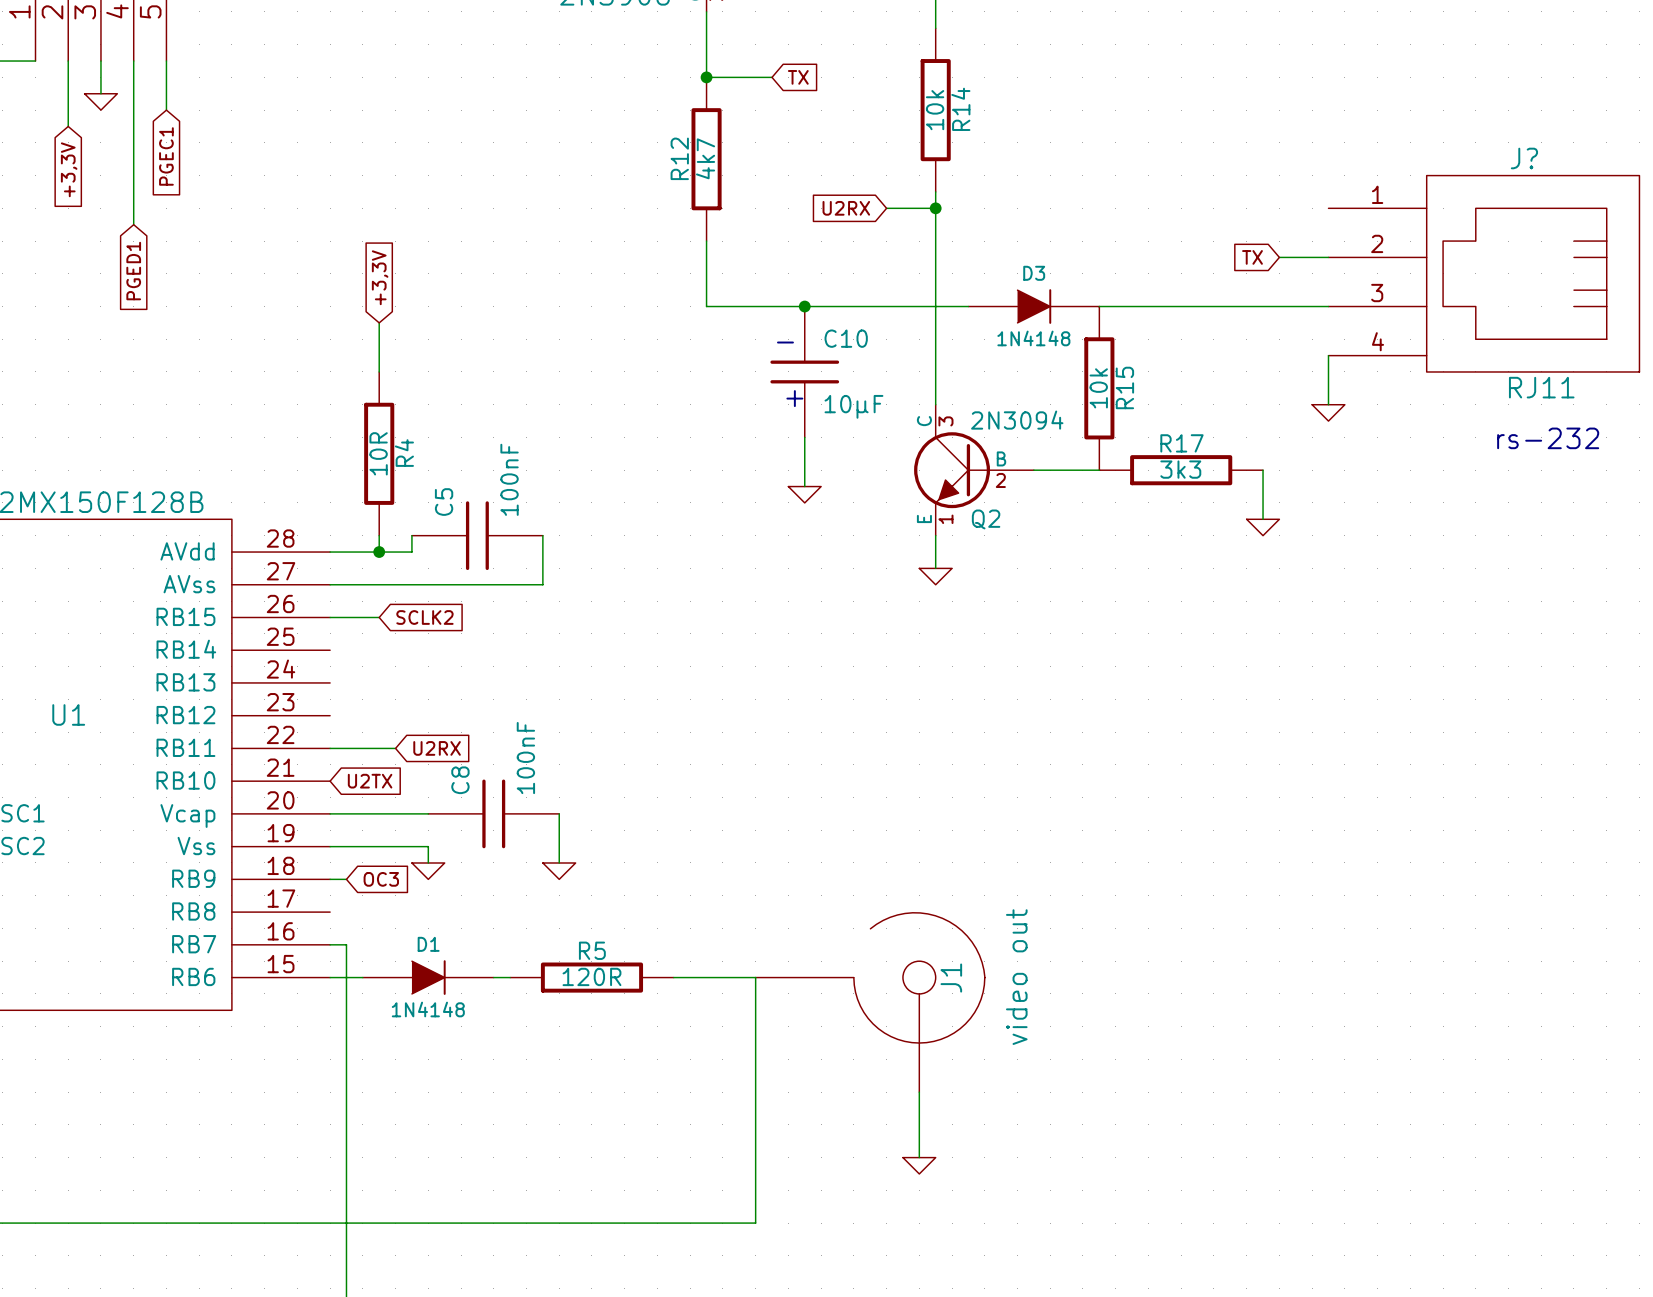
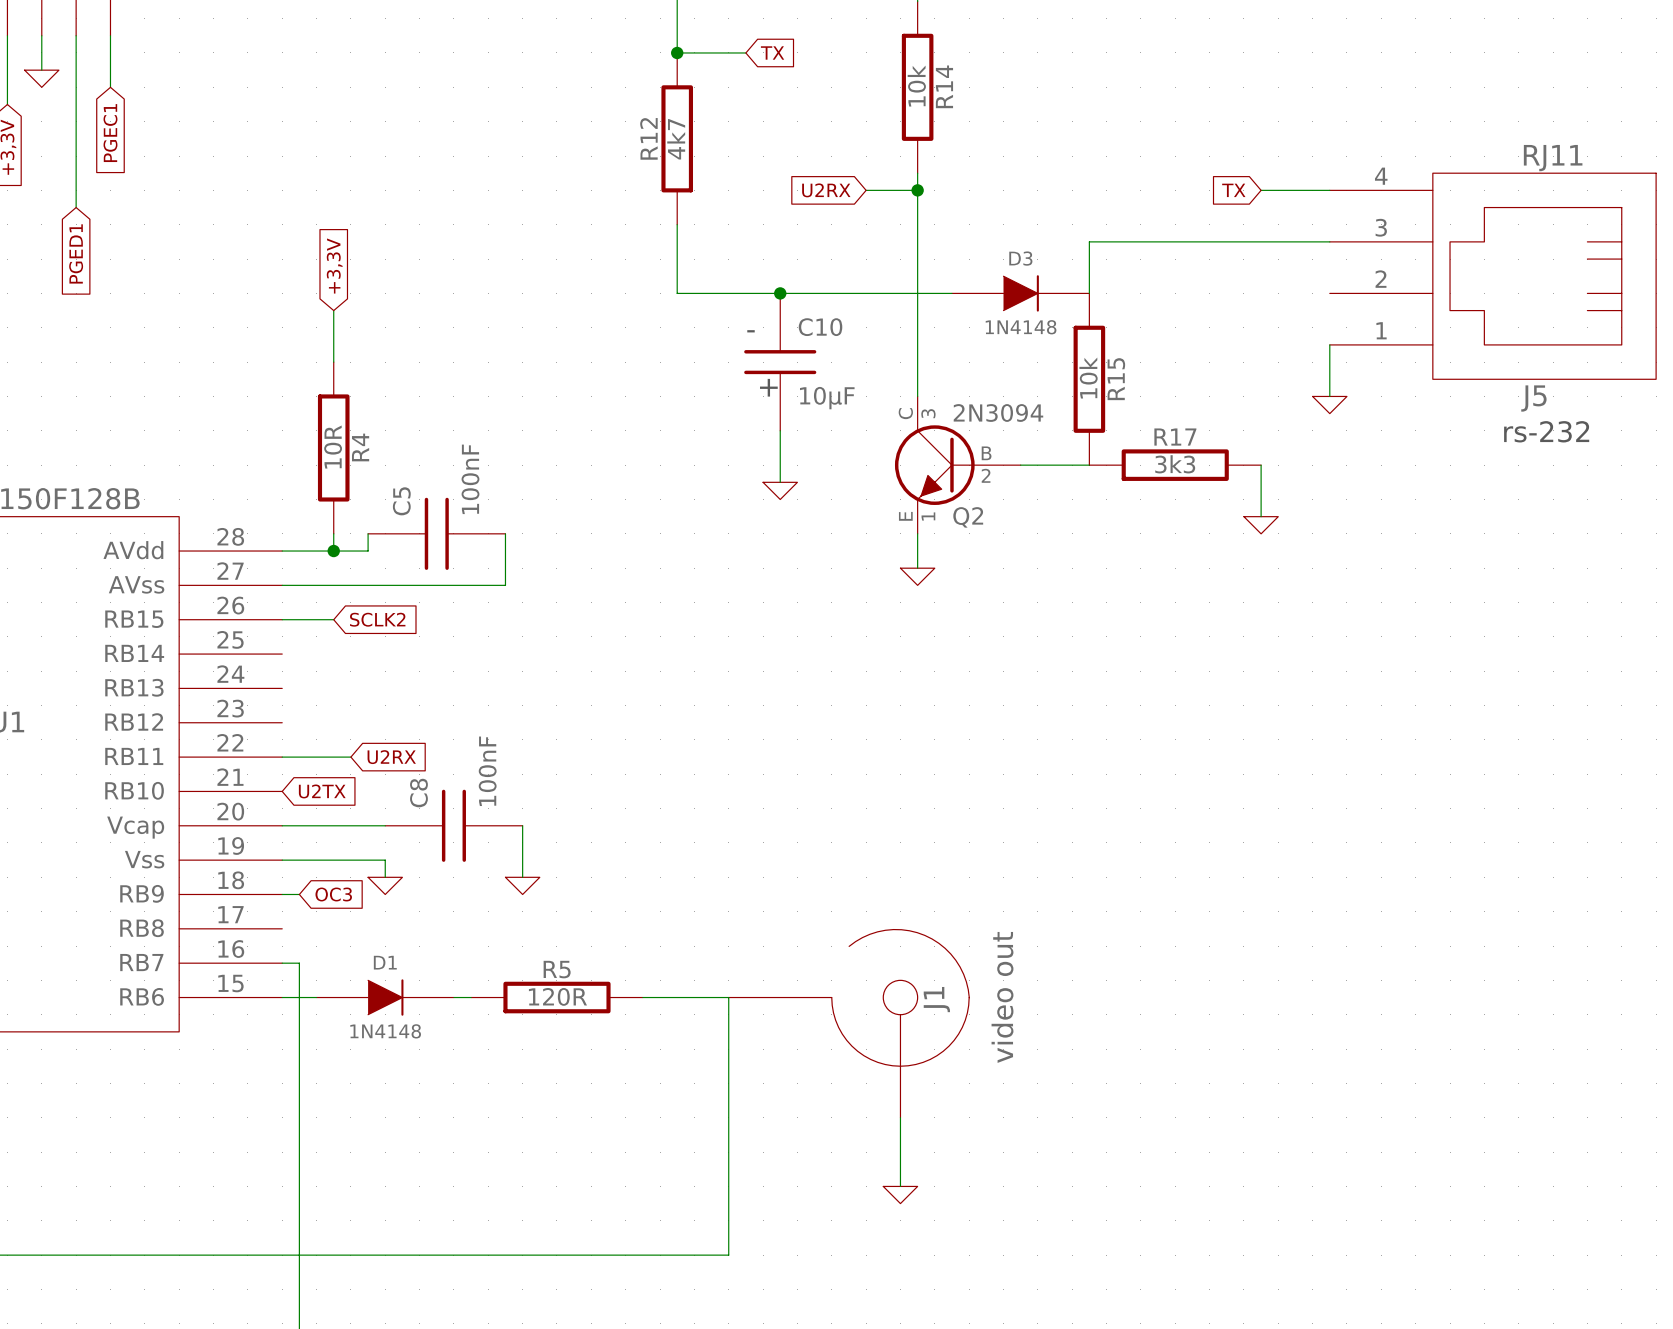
wire: none -> (1261, 190) (1329, 190)
global label position: TX (1252, 257) -> TX (1233, 190)
J?: RJ11 (1483, 273) -> none
J5: none -> RJ11 (1492, 276)
wire: (1099, 306) (1328, 306) -> (1089, 293) (1089, 241) (1278, 241)

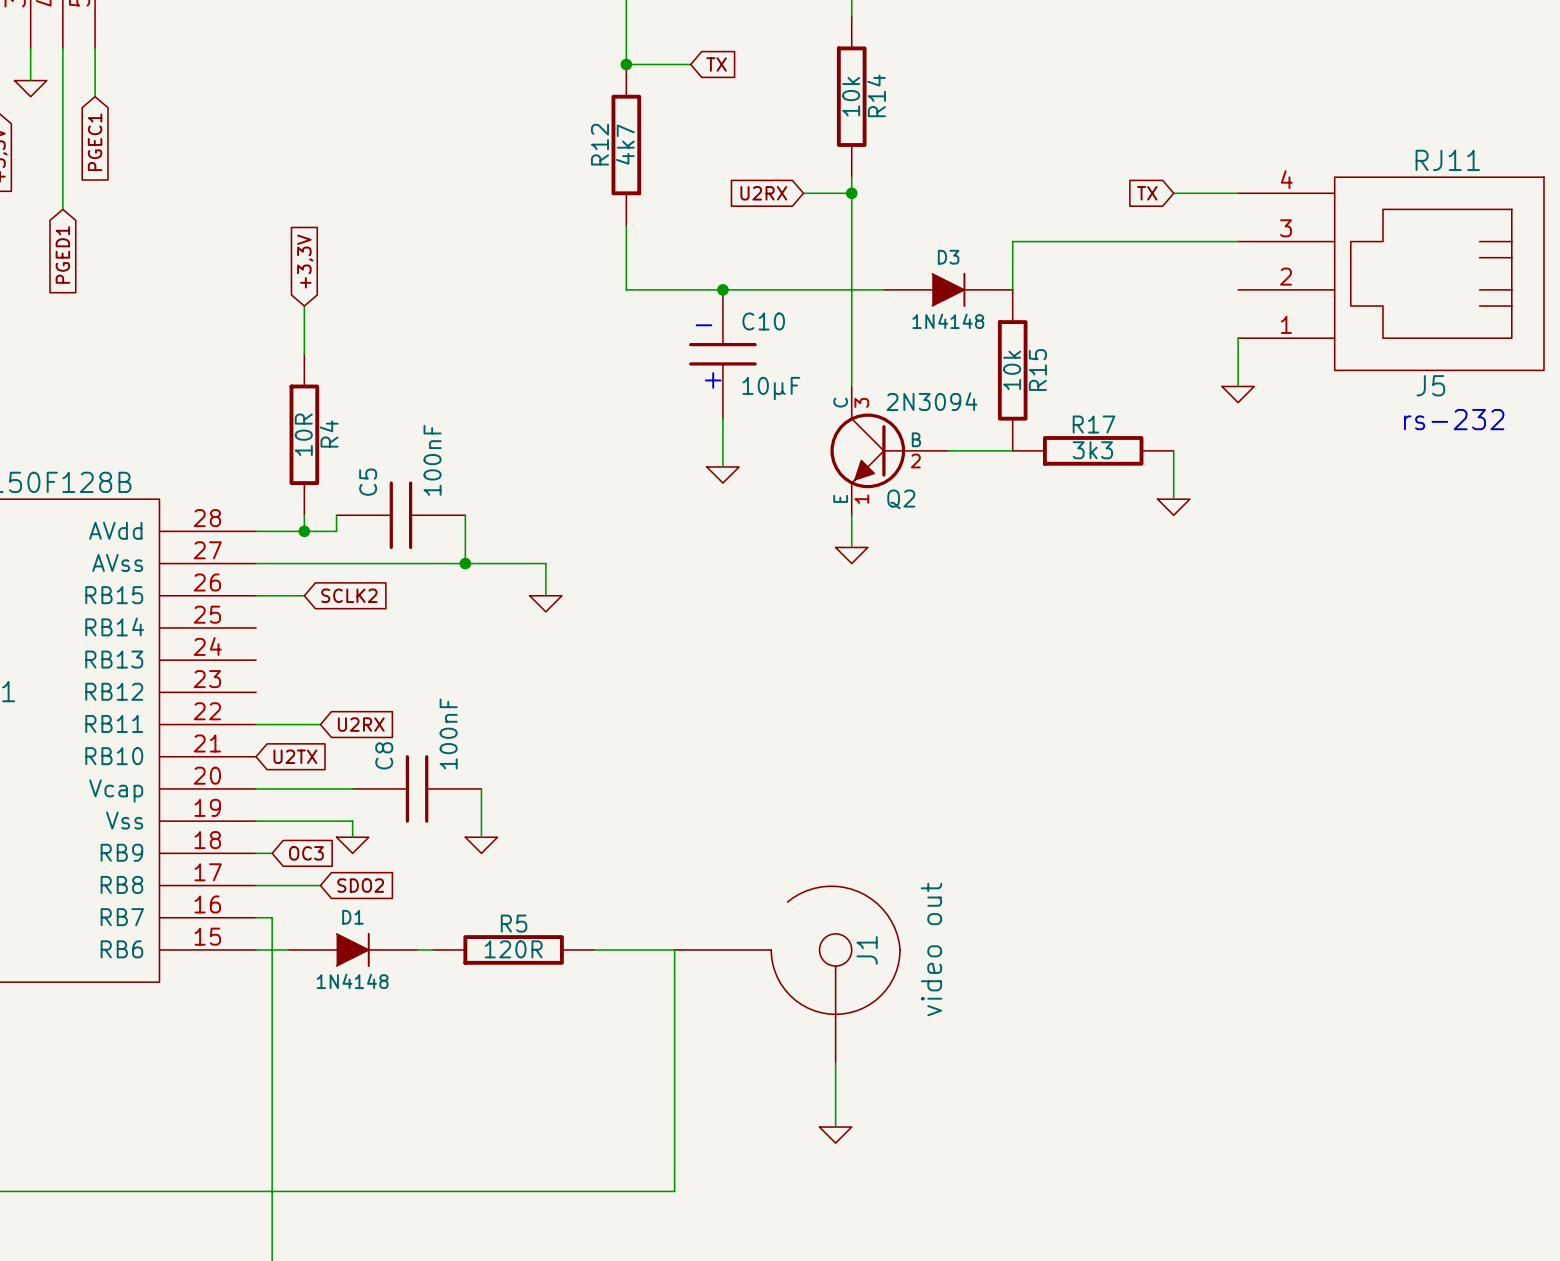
wire: none -> (465, 563) (545, 563) (545, 595)
junction: none -> (465, 563)
power symbol: none -> (545, 603)
wire: none -> (256, 885) (320, 885)
global label: none -> SDO2 (360, 885)

